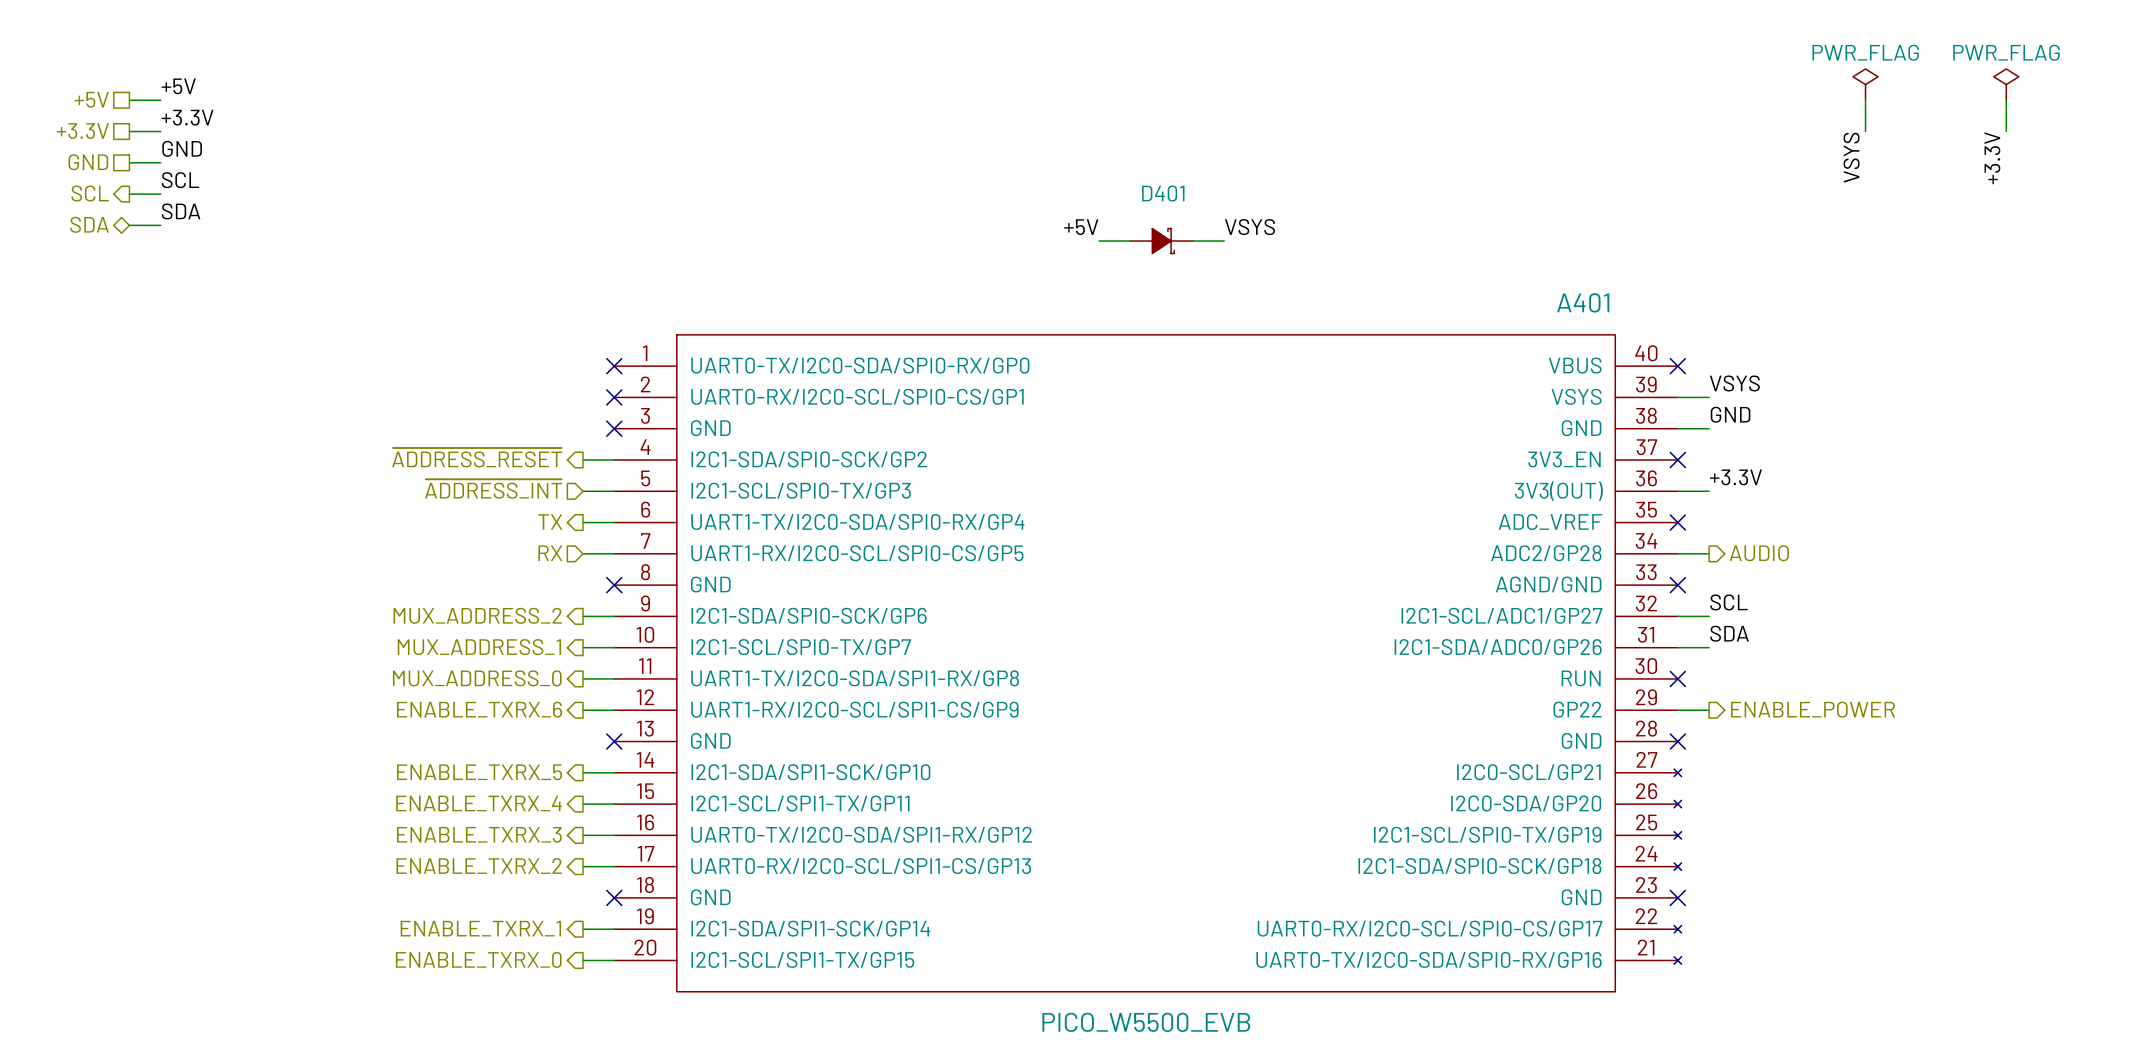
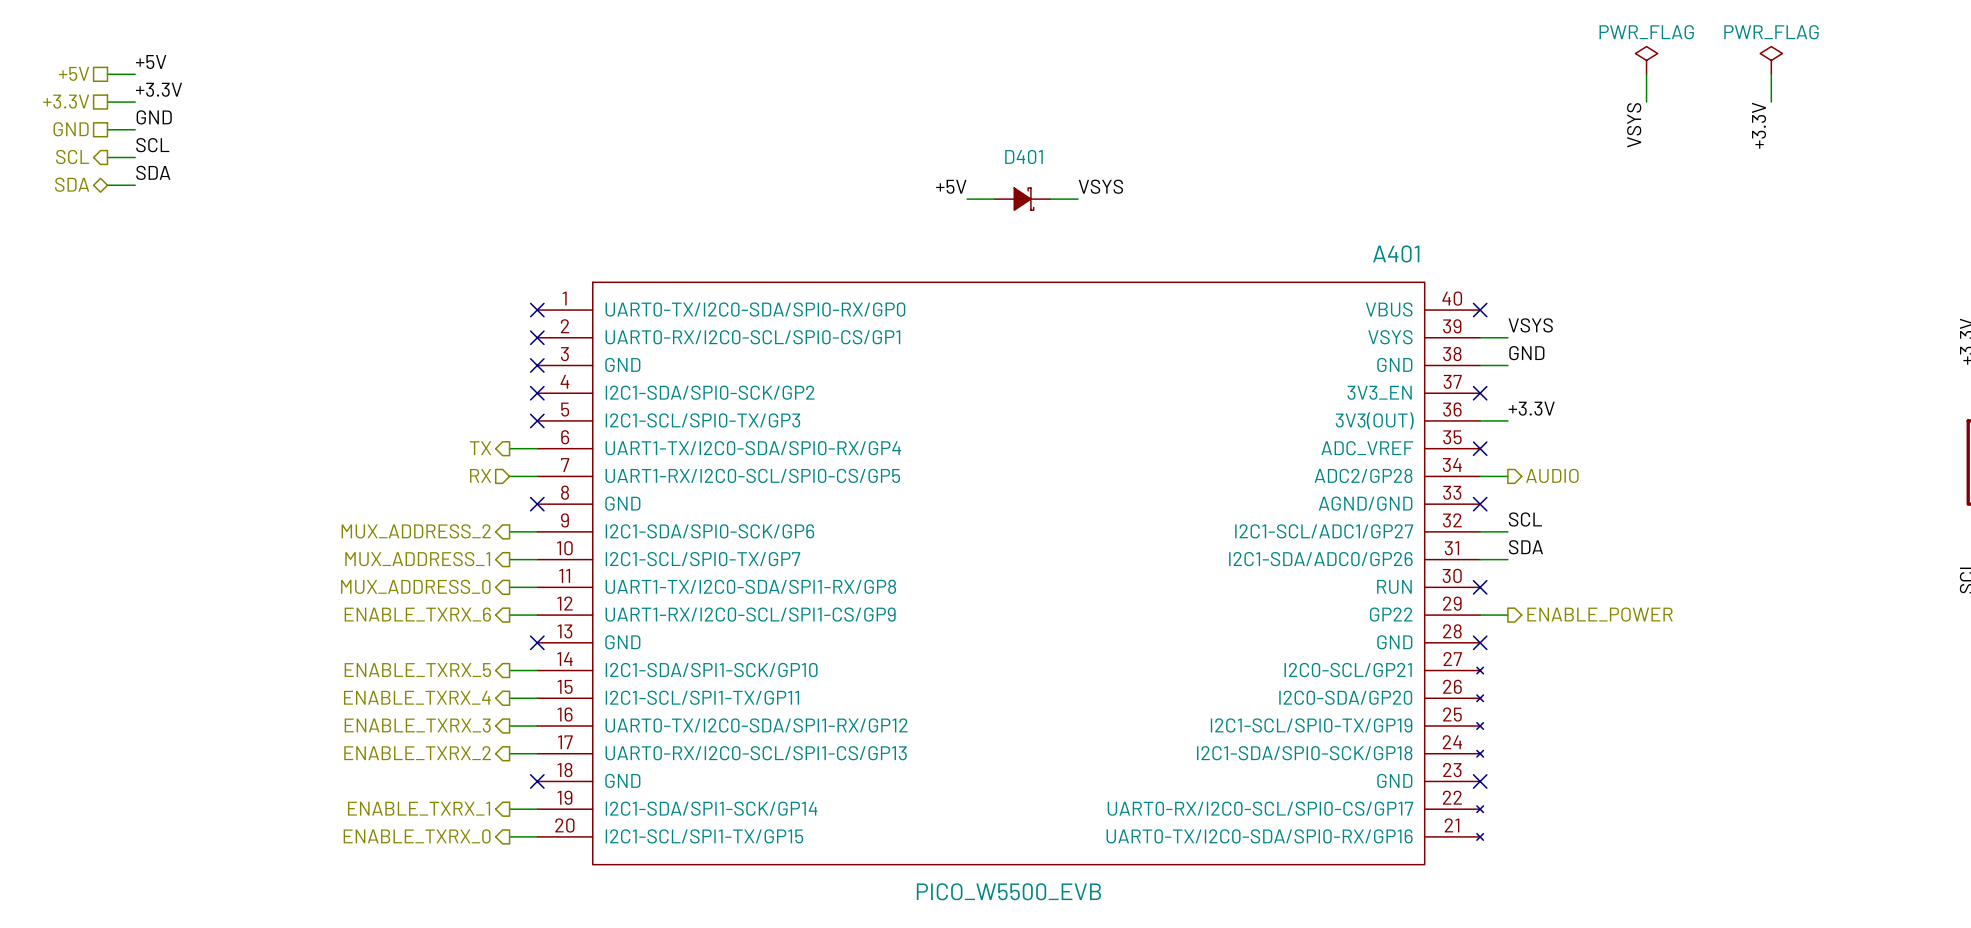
hierarchical label: ~{ADDRESS_RESET} (477, 457) -> none
wire: (583, 459) (614, 459) -> none
no-connect mark: none -> (537, 393)
hierarchical label: ~{ADDRESS_INT} (493, 488) -> none
wire: (583, 491) (614, 491) -> none
no-connect mark: none -> (537, 420)

